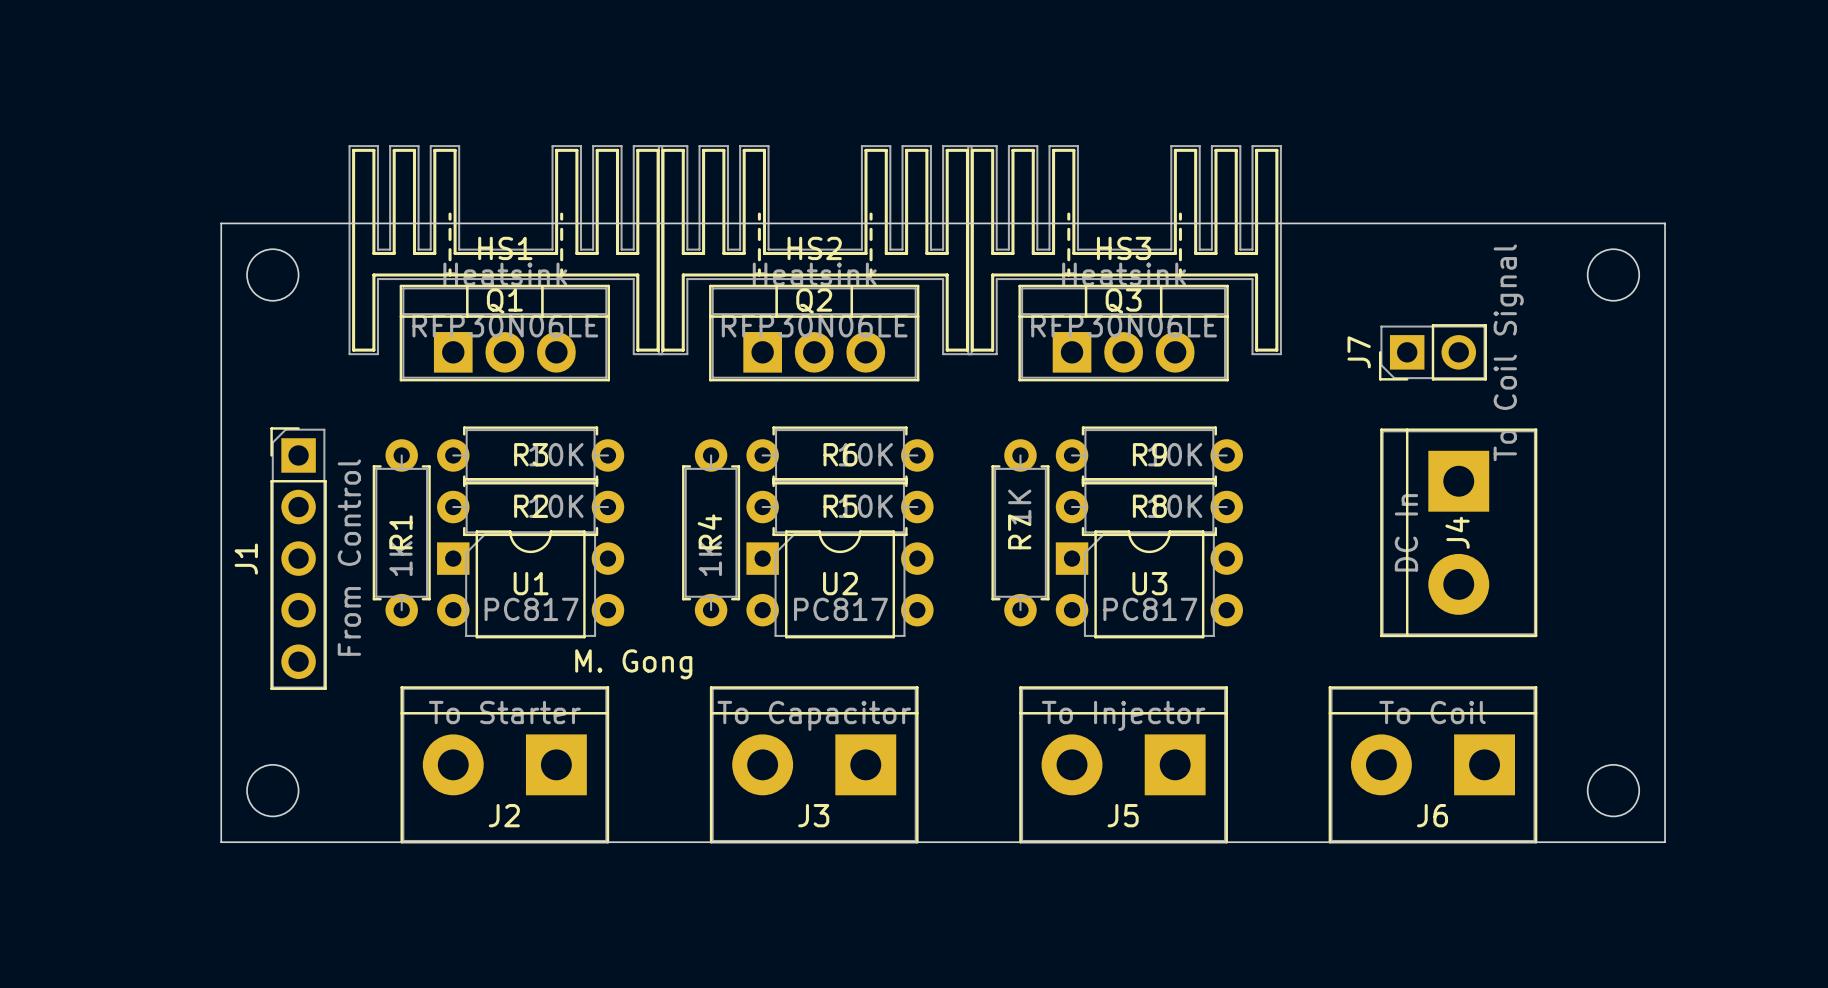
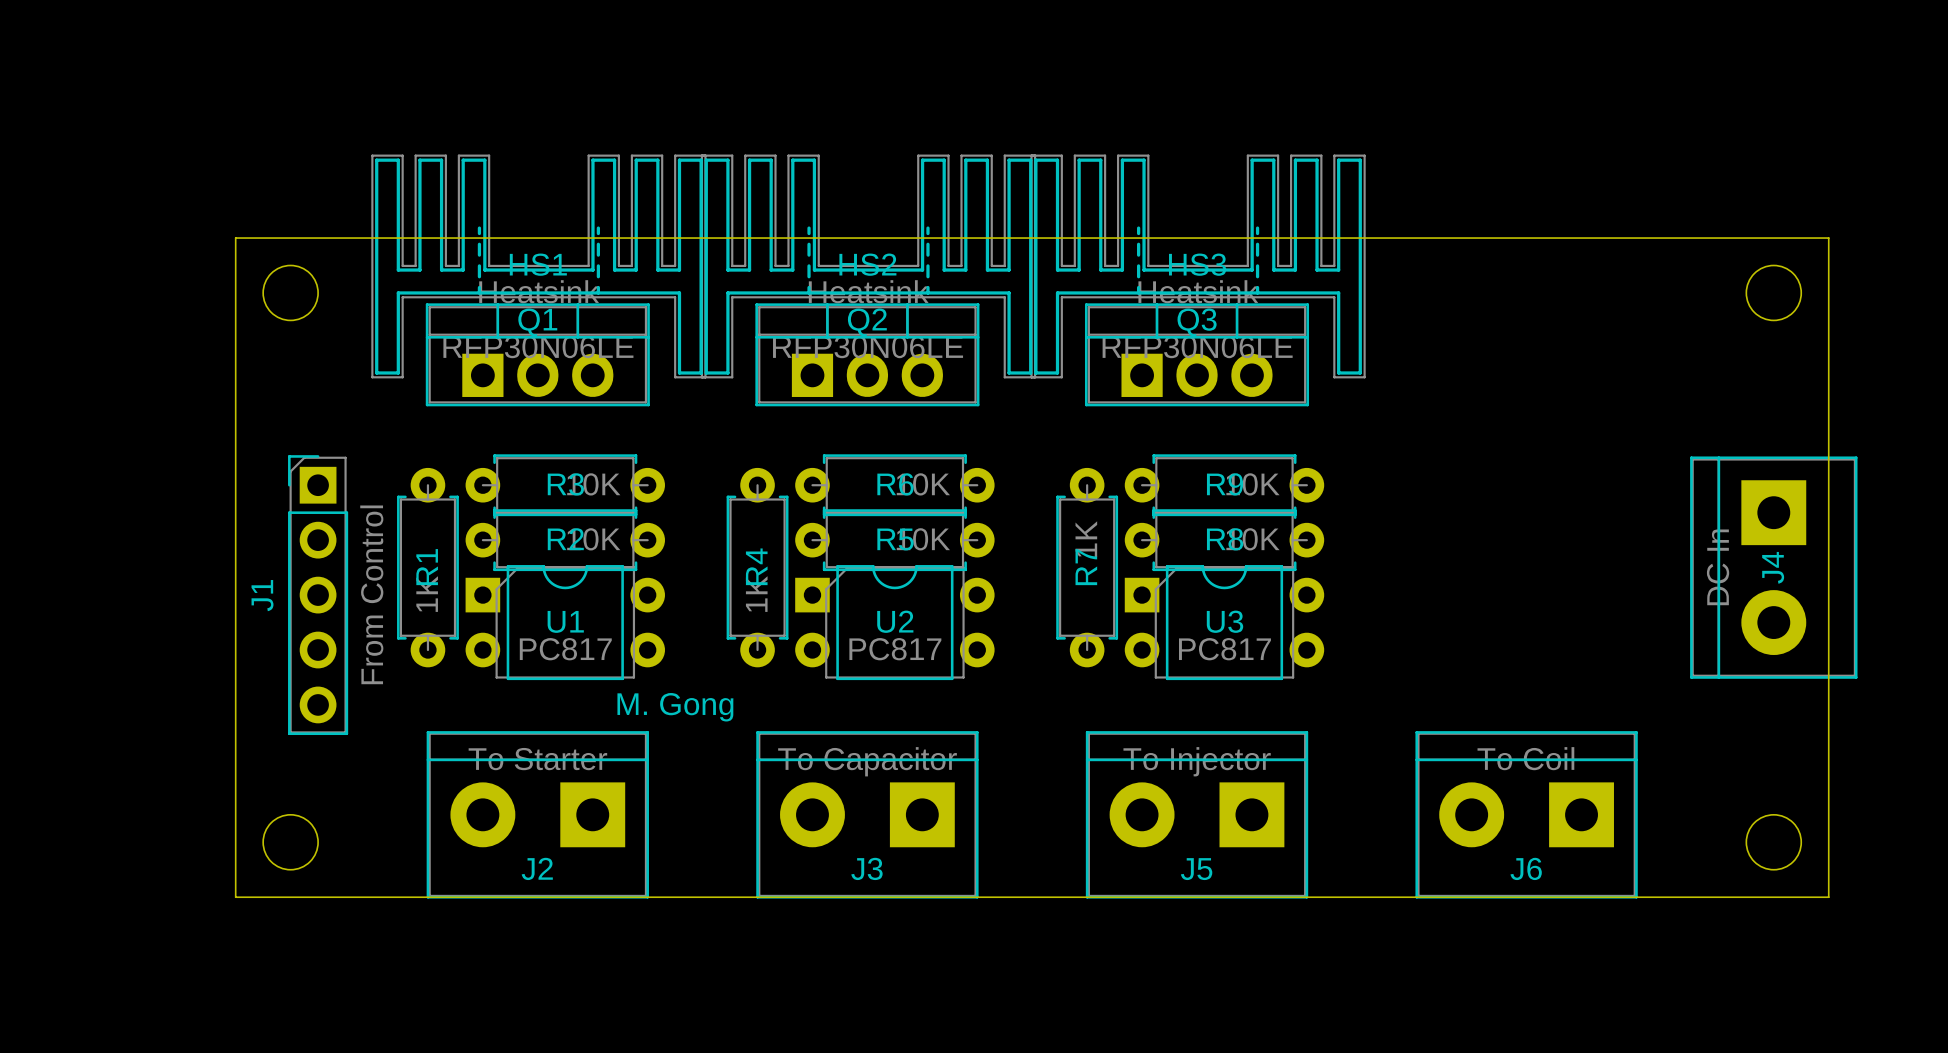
board edge: (1665, 223) (1665, 842) -> (1773, 238) (1828, 238) (1828, 897) (1773, 897)
round board edge position: (1613, 274) -> (1773, 292)
J7: To Coil Signal (1432, 352) -> none
J4 position: (1458, 532) -> (1773, 567)
round board edge position: (1613, 790) -> (1773, 842)

